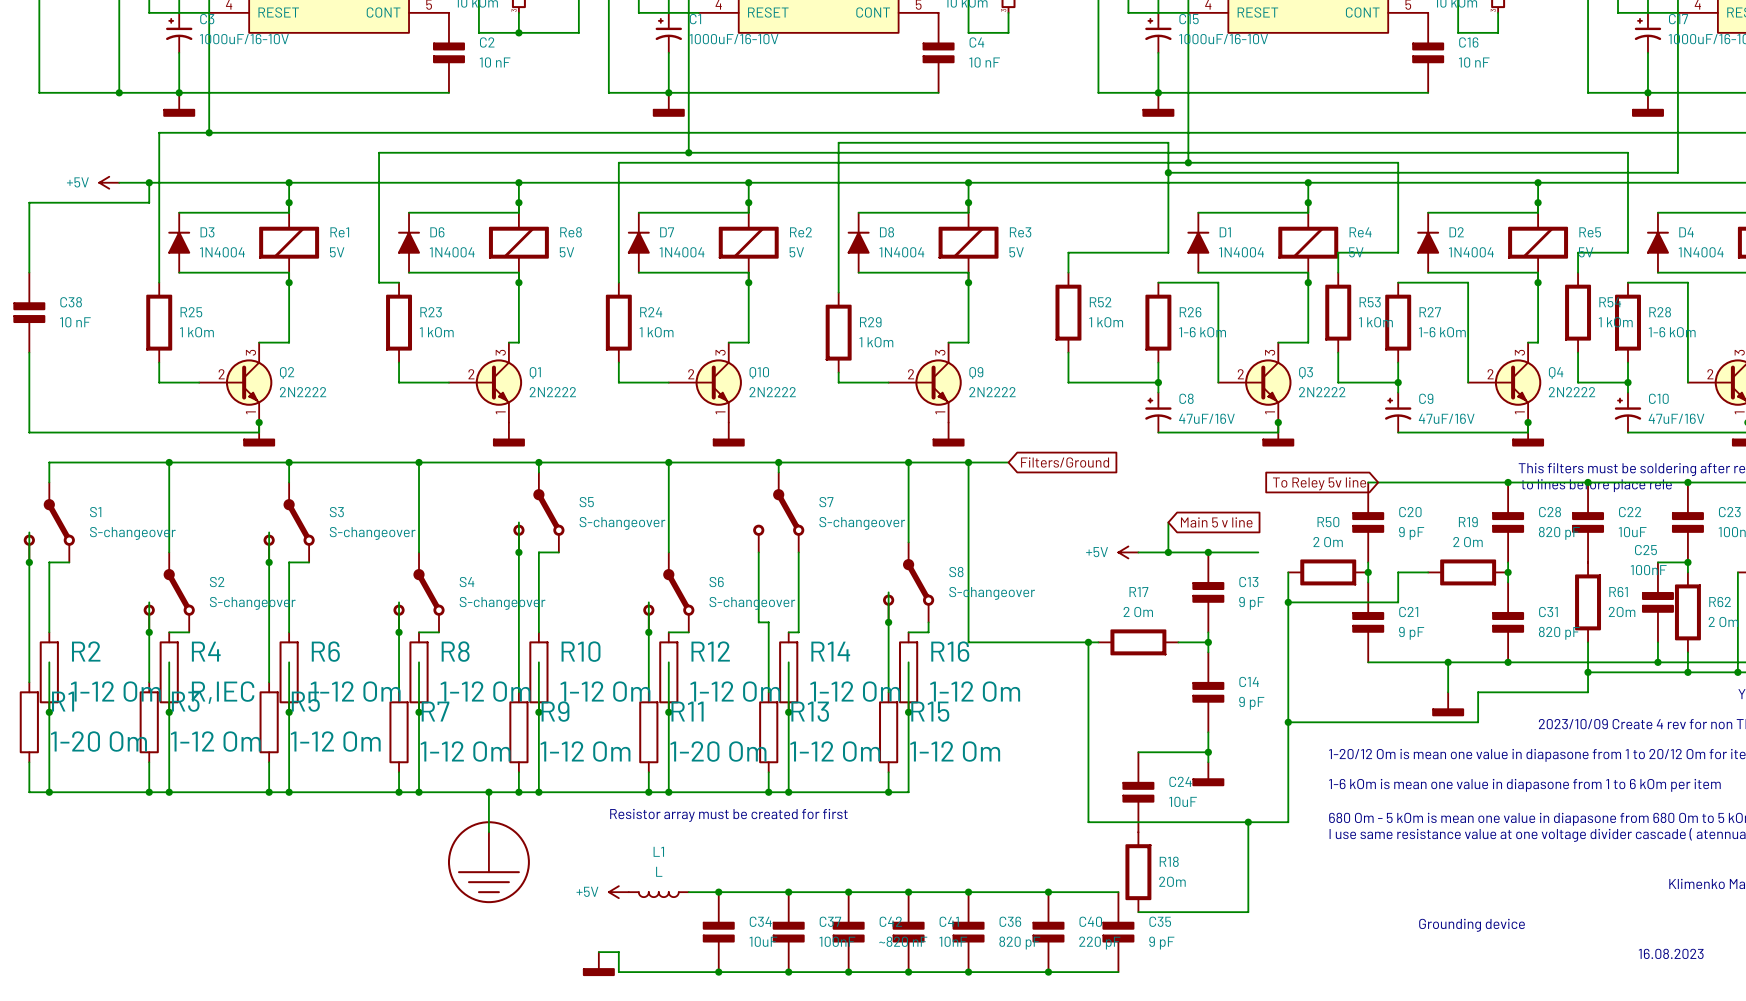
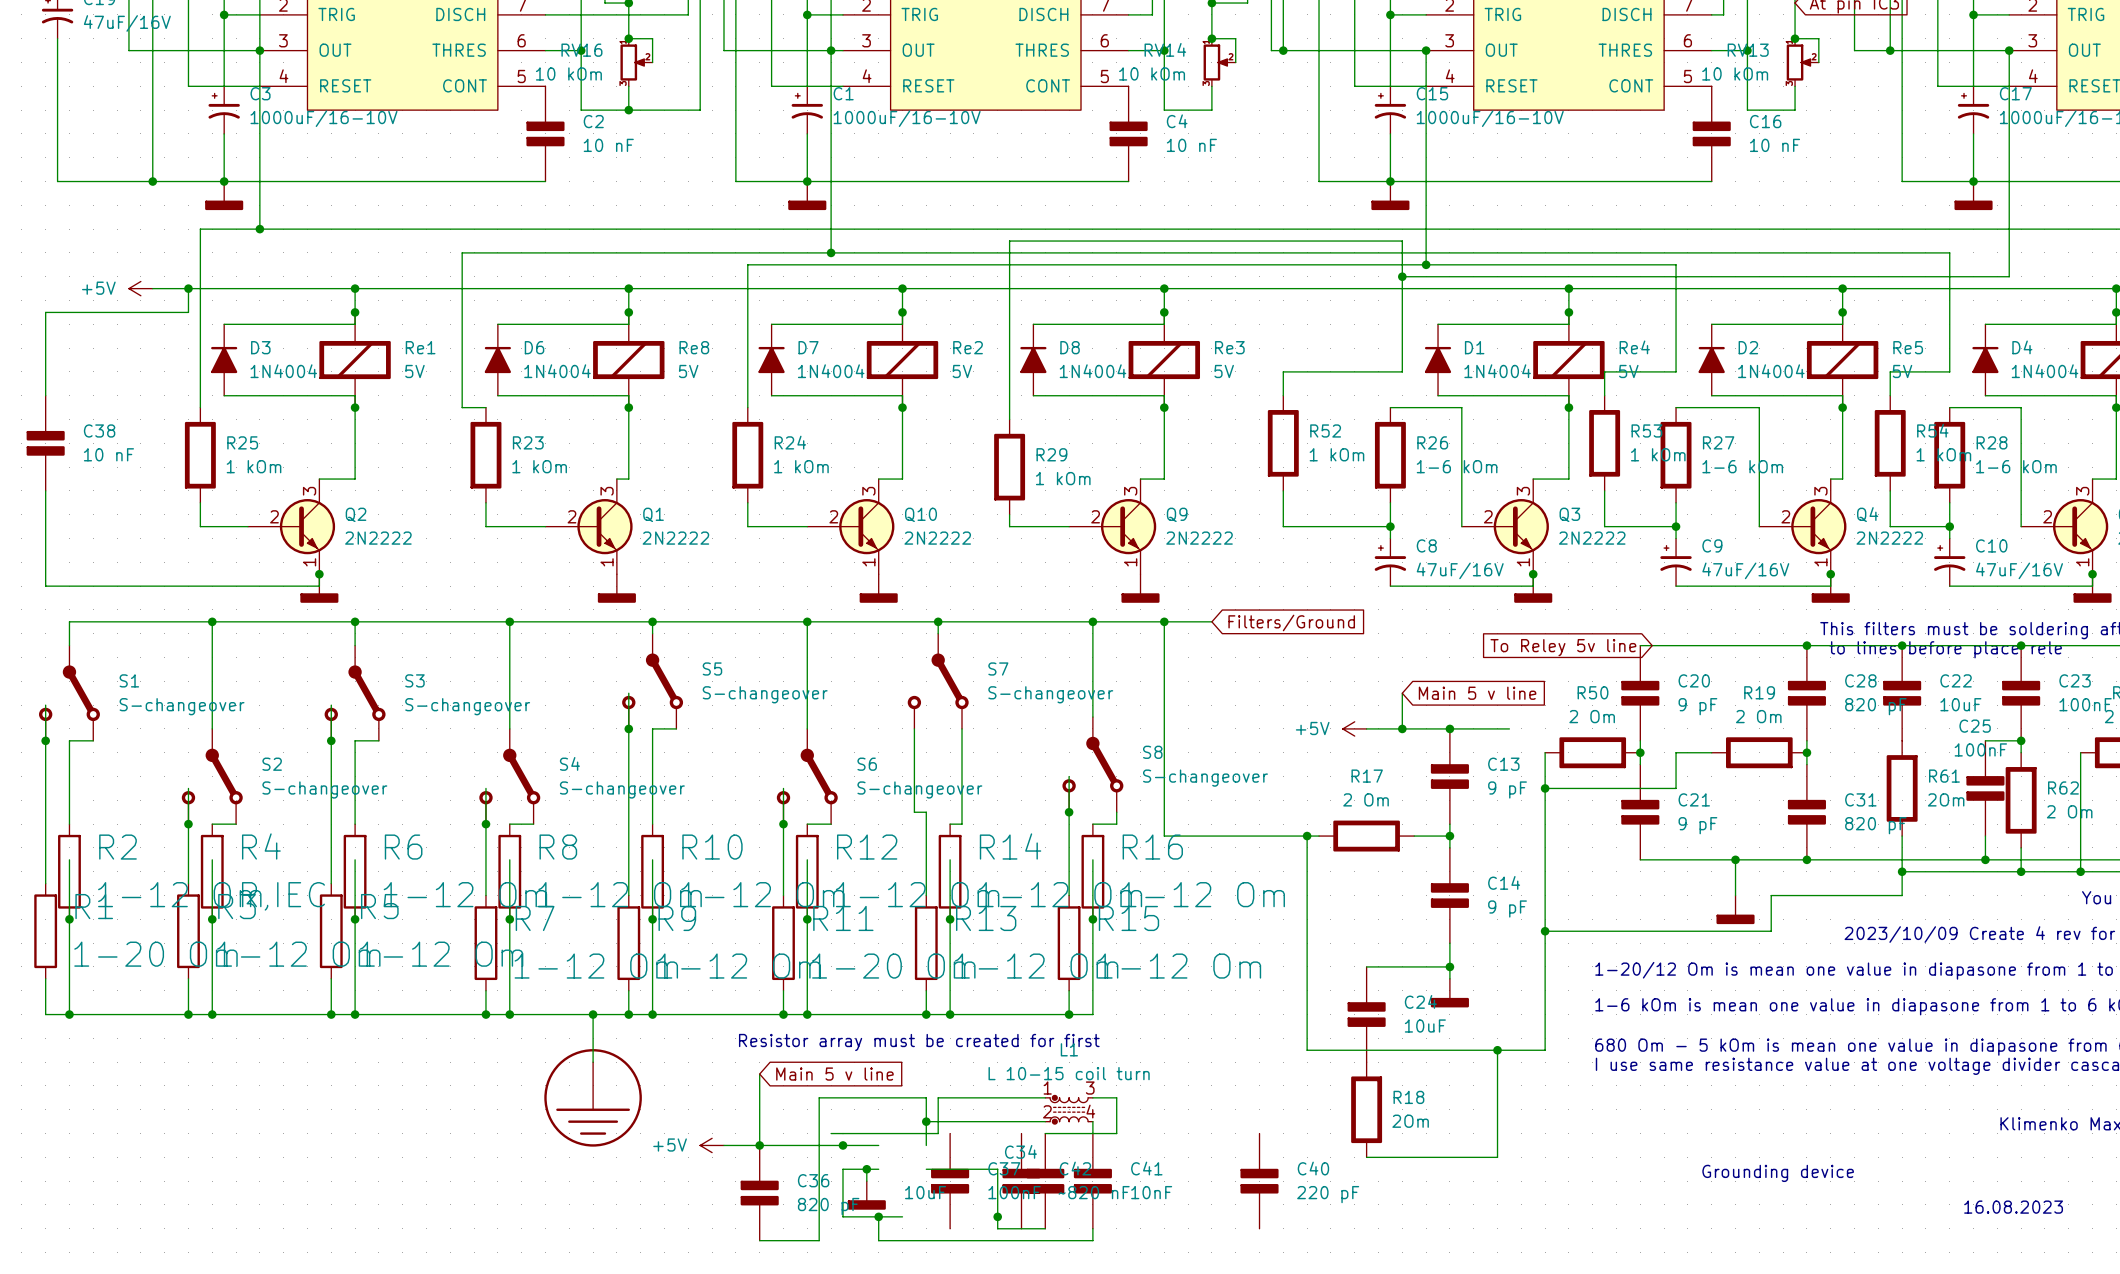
wire: none -> (759, 1074) (759, 1145)
global label: none -> Main 5 v line (834, 1074)
L1 value: L (659, 871) -> L 10-15 coil turn (1069, 1073)
wire: none -> (926, 1121) (1045, 1121)
wire: none -> (1092, 1121) (1092, 1133)
power symbol position: +5V (618, 892) -> +5V (712, 1145)
L1 symbol: [628, 892, 689, 898] -> [1045, 1095, 1093, 1125]
junction: (718, 892) -> none
wire: (778, 892) (868, 892) -> (938, 1133) (938, 1097) (1045, 1097)
junction position: (788, 892) -> (926, 1121)
junction: (848, 892) -> none
junction: (908, 892) -> none
wire: (928, 892) (1118, 892) -> (1116, 1133) (1116, 1097) (1092, 1097)
junction: (968, 892) -> none
junction: (1048, 892) -> none
wire: none -> (723, 1145) (878, 1145)
junction: none -> (759, 1145)
junction: none -> (842, 1145)
wire: none -> (926, 1145) (926, 1097) (819, 1097) (819, 1240) (759, 1240)
C34 name position: C34 (760, 921) -> C34 (1020, 1151)
junction: none -> (866, 1169)
wire: none -> (878, 1169) (842, 1169) (842, 1216) (902, 1216)
C34 position: (718, 932) -> (1045, 1181)
C36 position: (968, 932) -> (759, 1193)
C35: 9 pF (1118, 932) -> none
wire: (598, 952) (618, 952) (618, 972) (828, 972) -> (926, 1169) (997, 1169) (997, 1228)
wire: none -> (878, 1216) (878, 1240) (1092, 1240) (1092, 1228)
junction: none -> (997, 1216)
power symbol position: (598, 964) -> (866, 1195)
junction position: (718, 972) -> (878, 1216)
junction: (788, 972) -> none
junction: (848, 972) -> none
wire: (868, 972) (1118, 972) -> none
junction: (908, 972) -> none
junction: (968, 972) -> none
junction: (1048, 972) -> none

